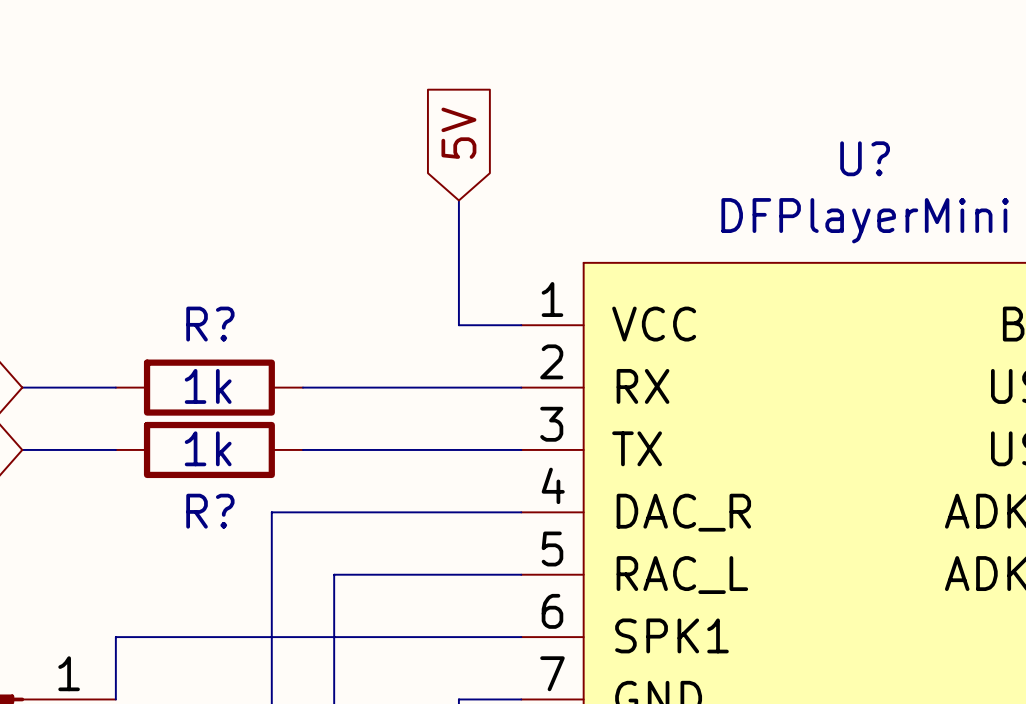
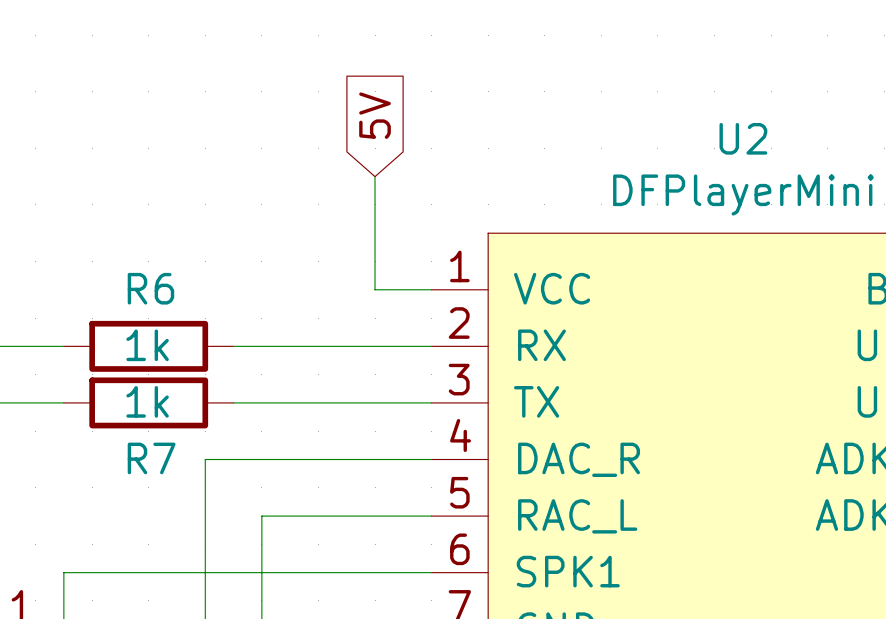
U? name: U? (865, 158) -> U2 (743, 138)
R? name: R? (210, 324) -> R6 (150, 288)
R? name: R? (210, 511) -> R7 (151, 458)

